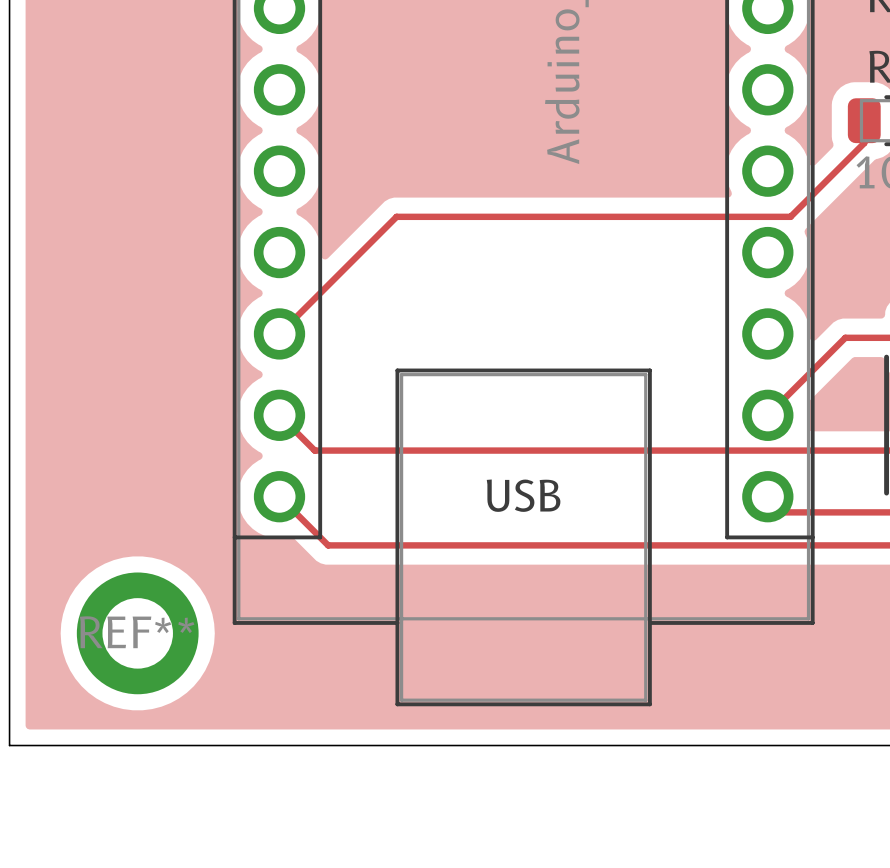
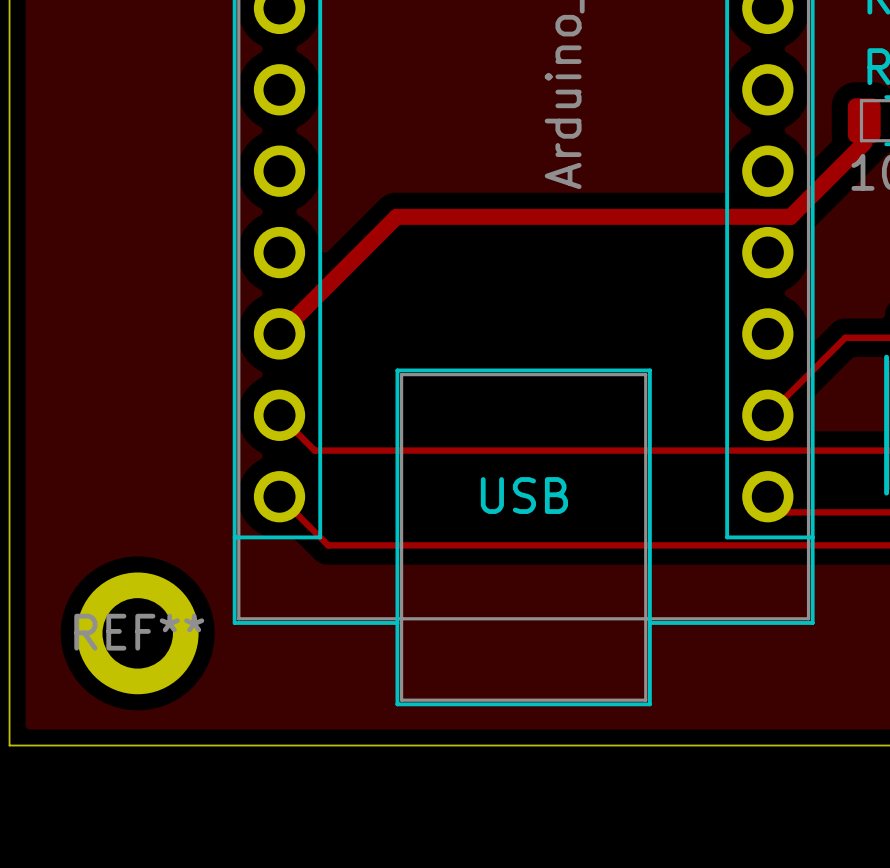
track width: thin (864, 143) (790, 216) (396, 216) (279, 333) -> thick (864, 143) (790, 216) (396, 216) (279, 333)

